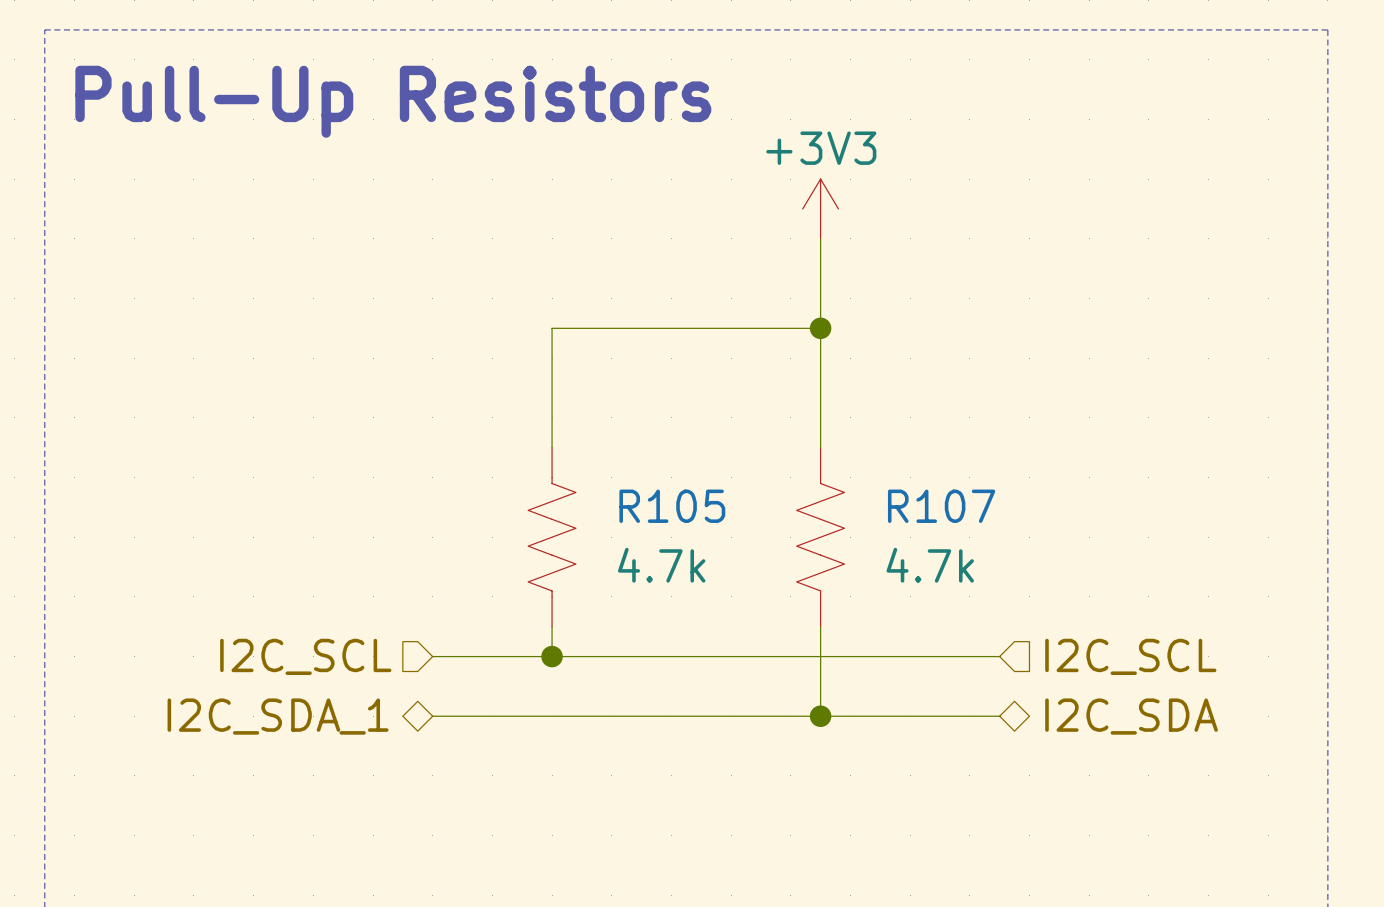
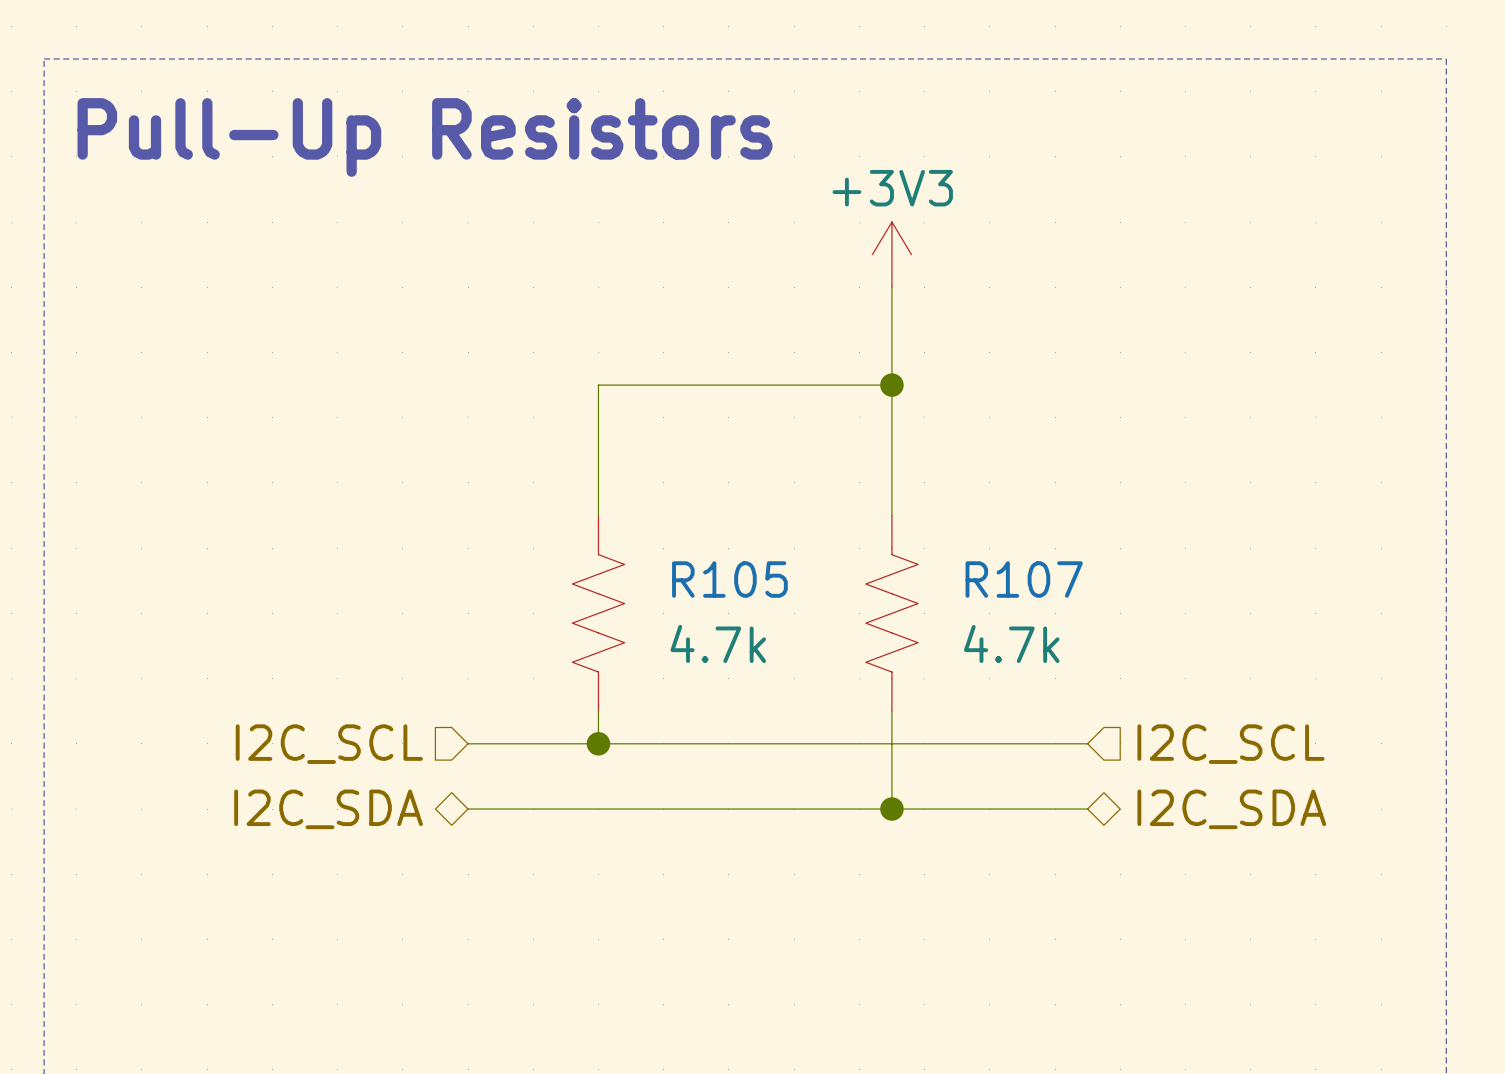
hierarchical label: I2C_SDA_1 (278, 716) -> I2C_SDA (328, 809)

